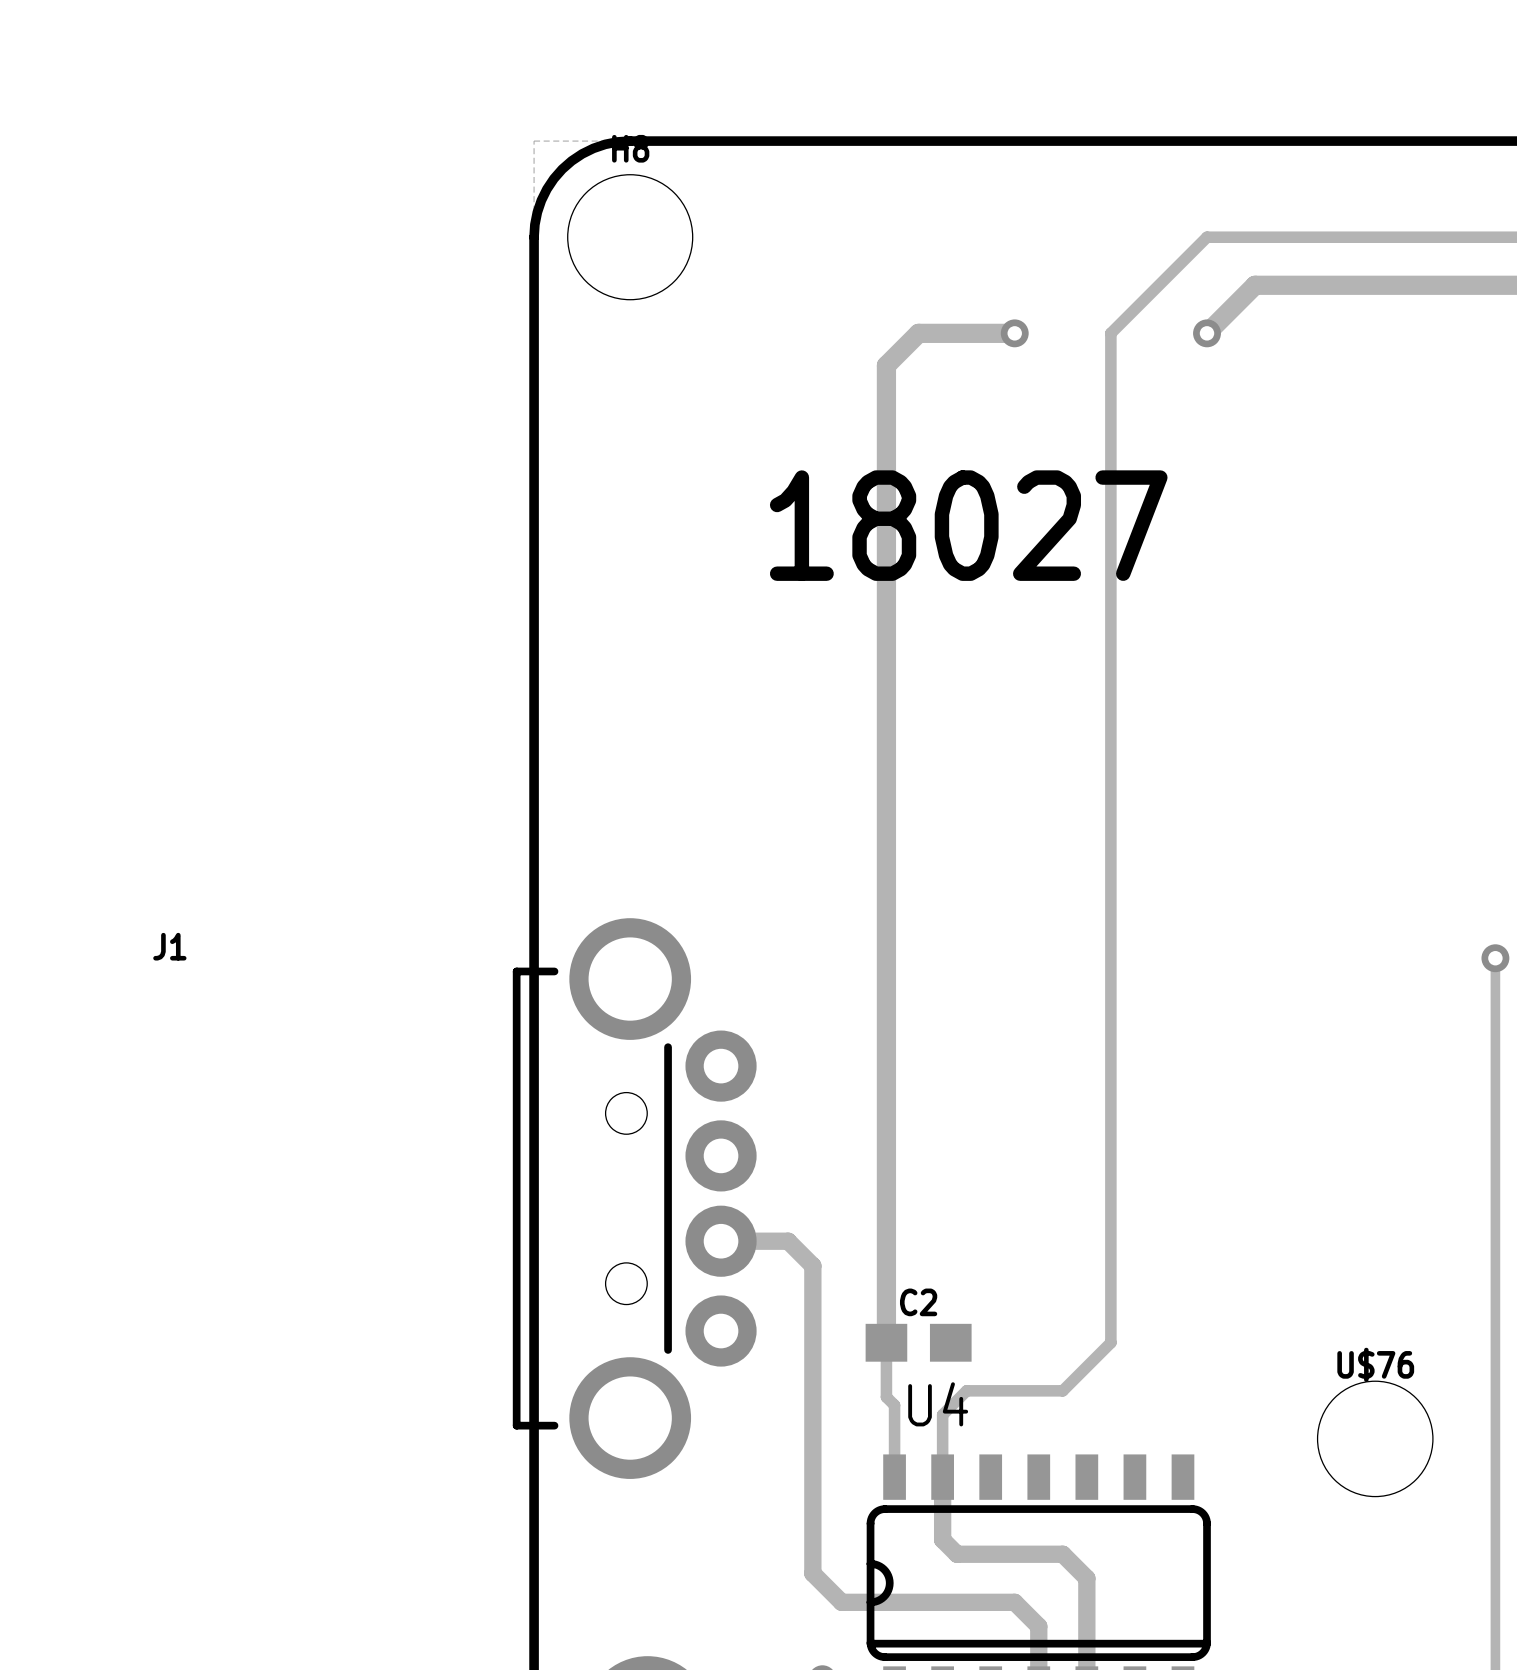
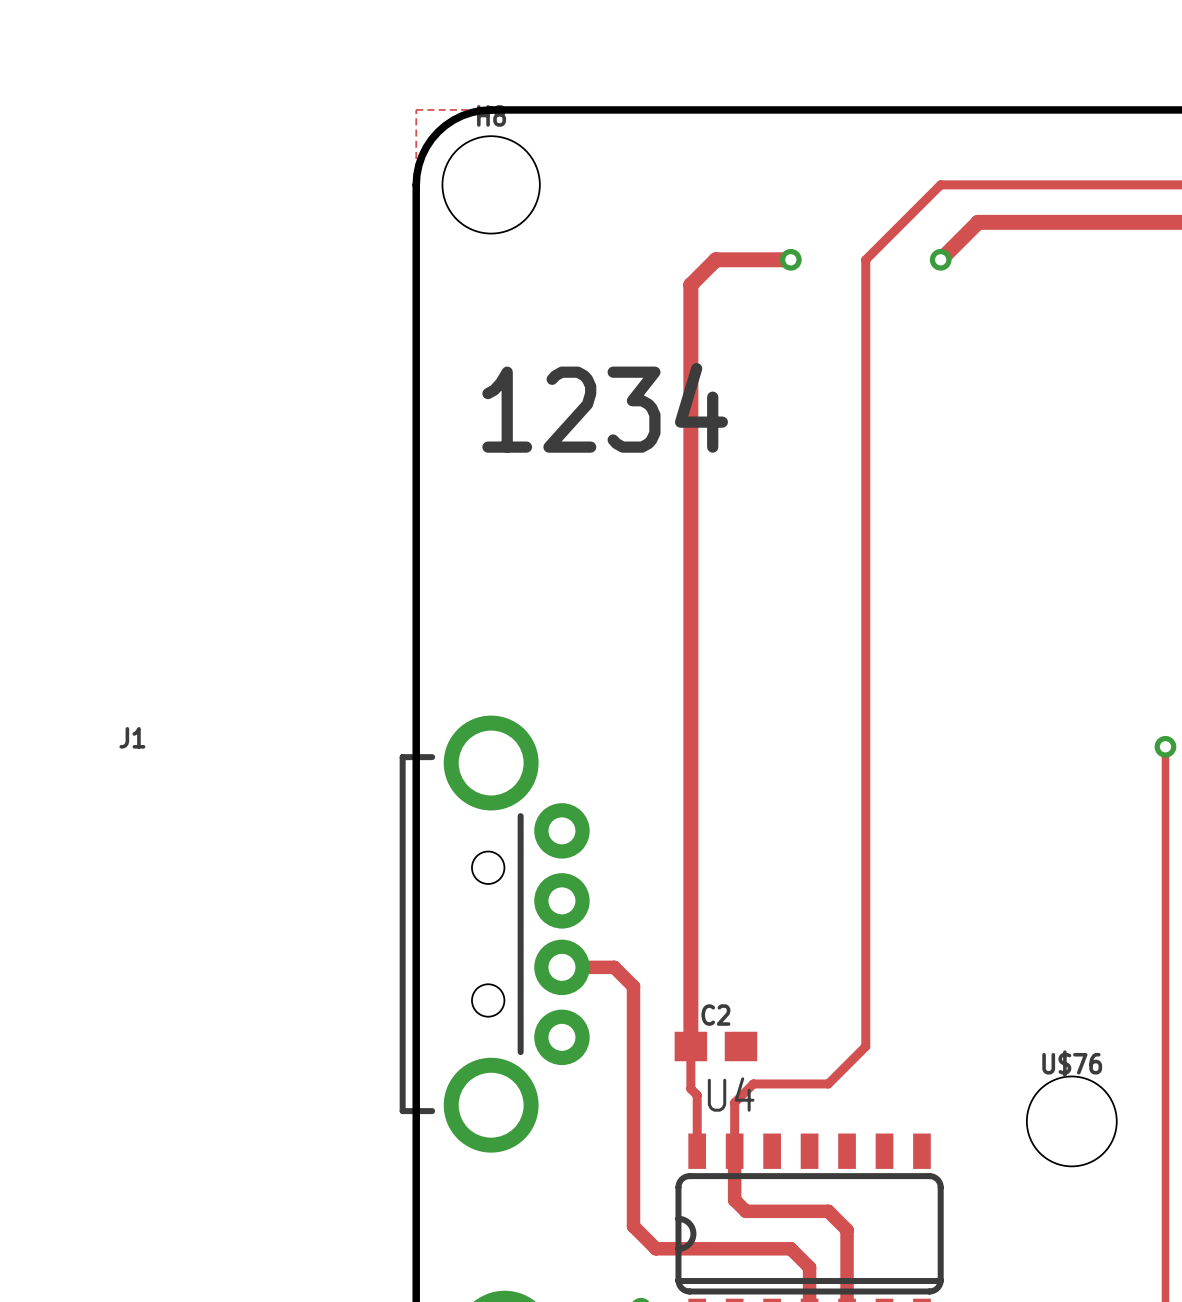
text: none -> 1234 (605, 407)
text: 18027 (968, 525) -> none

